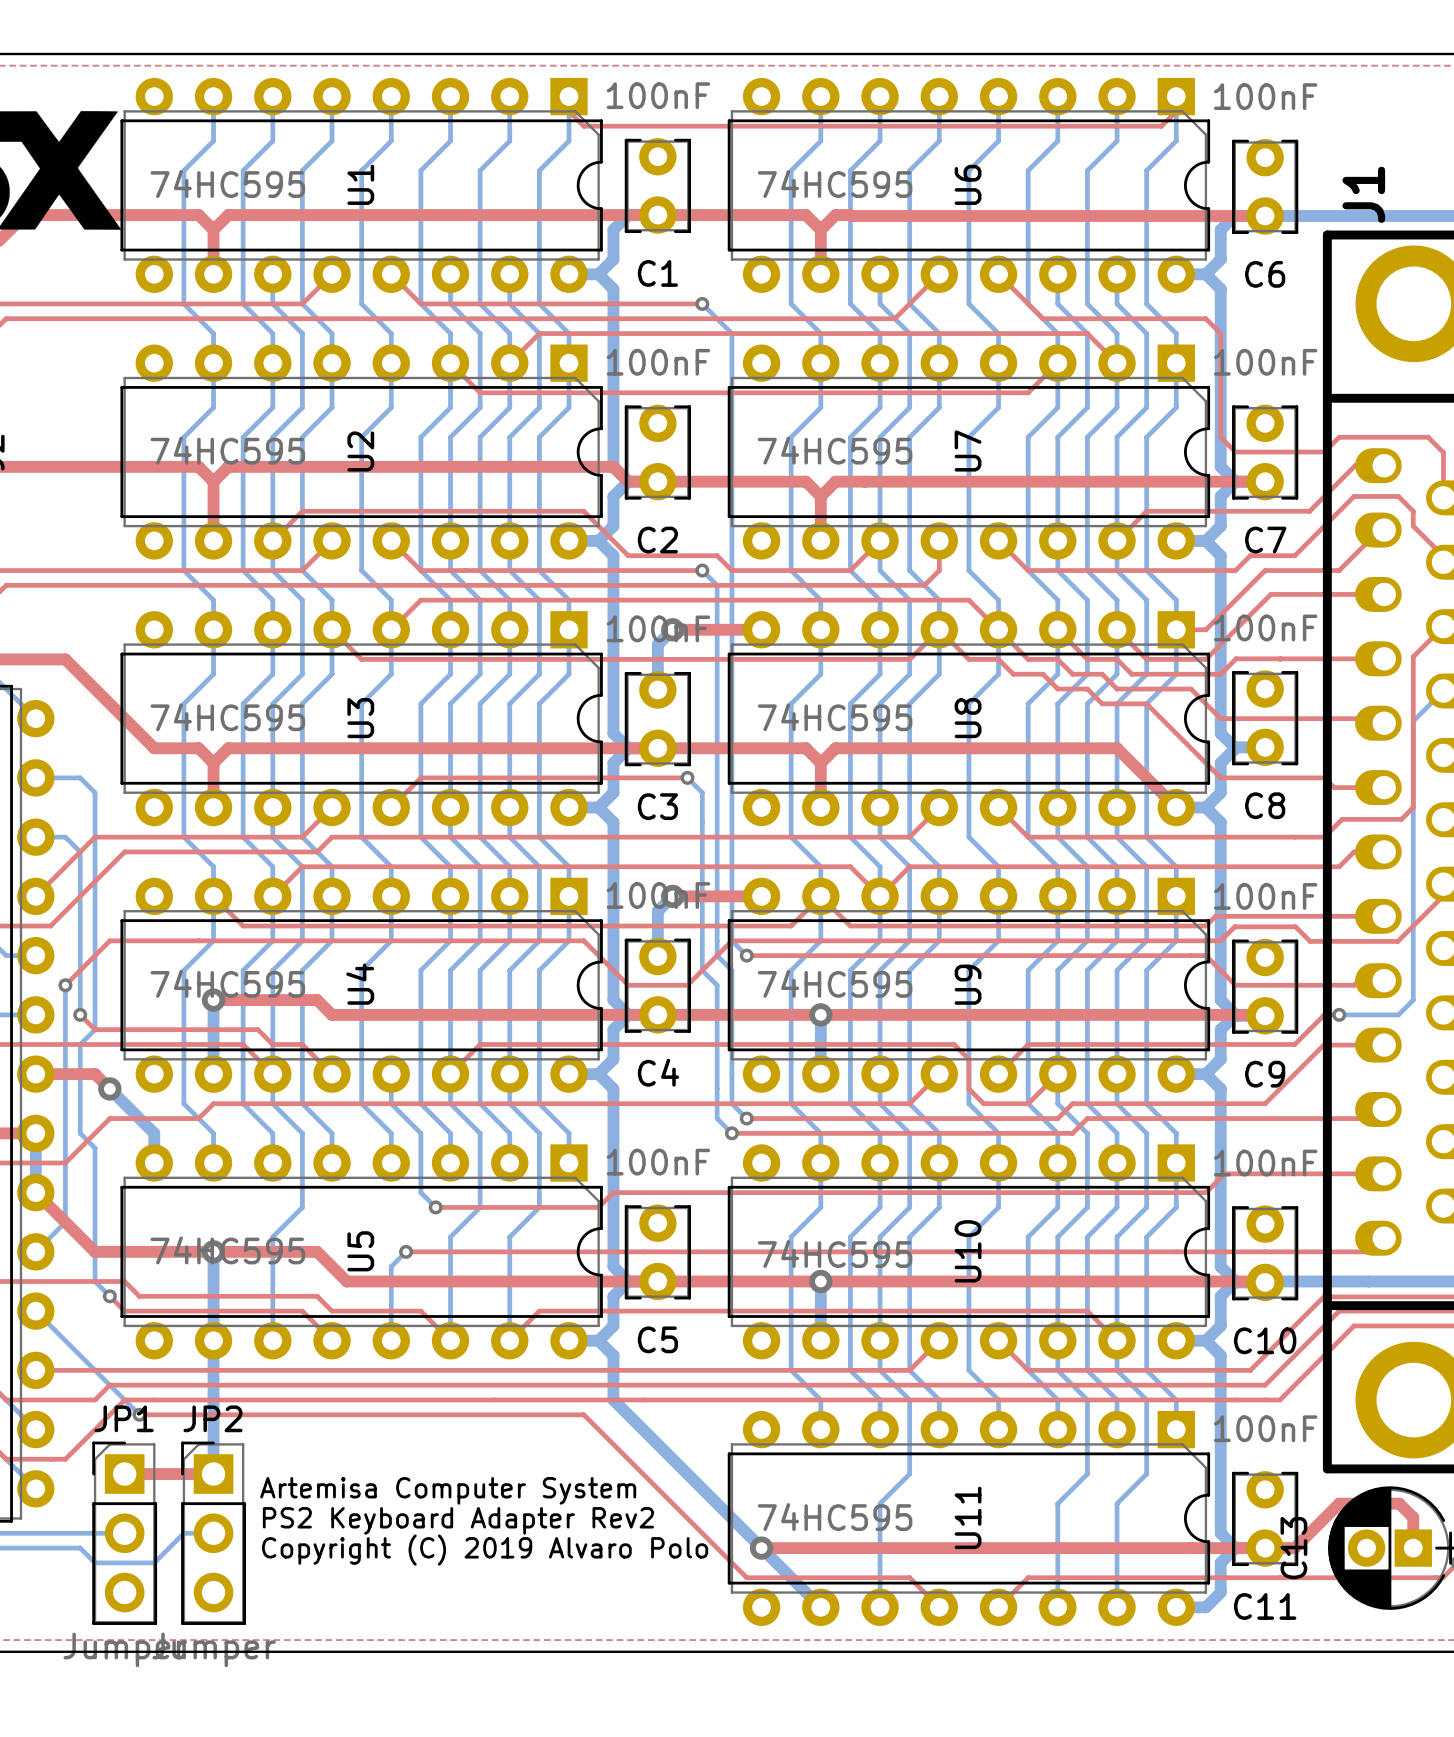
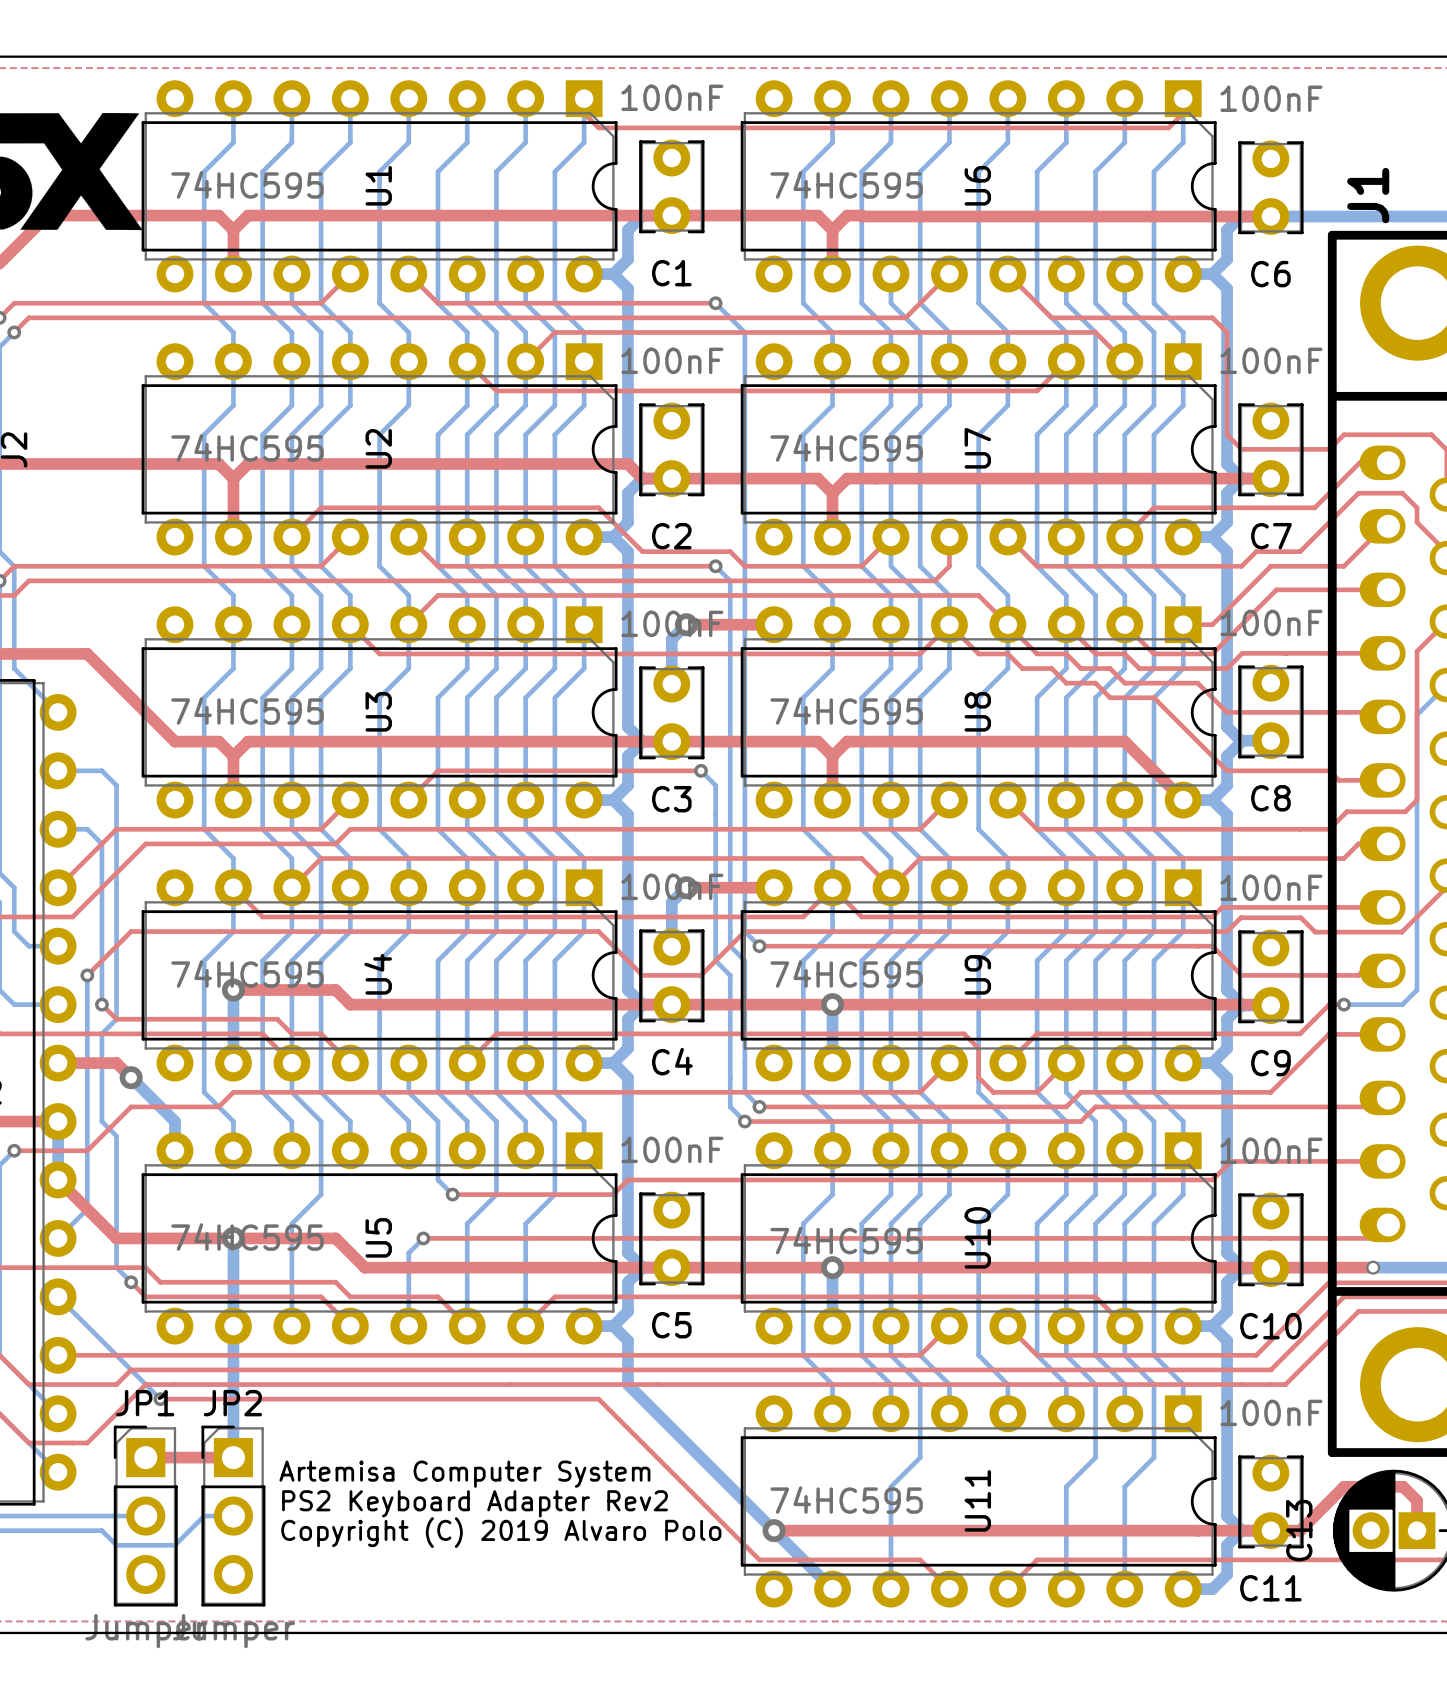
bottom track: (1368, 1281) (1265, 1282) -> none
top track: none -> (1373, 1267) (1270, 1268)
via: none -> (1373, 1267)

